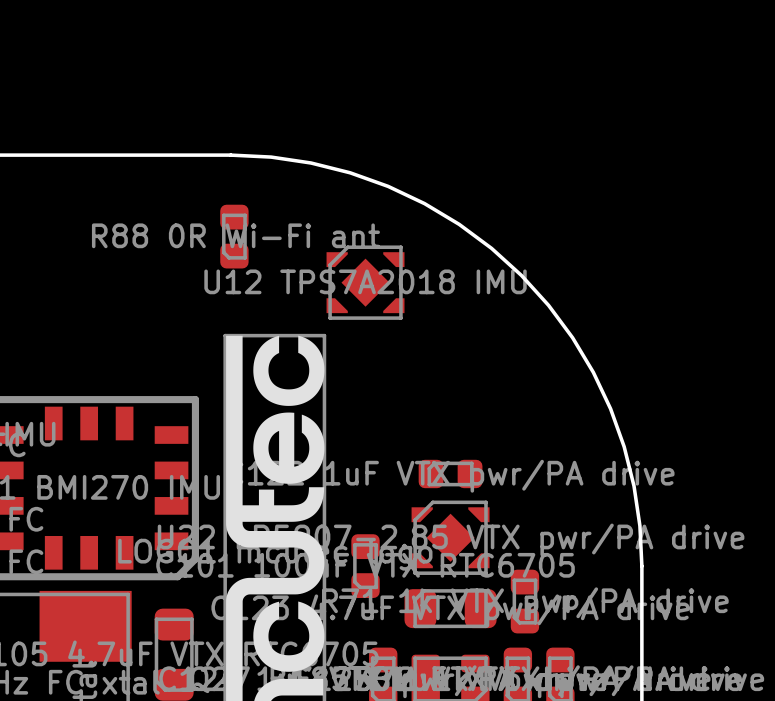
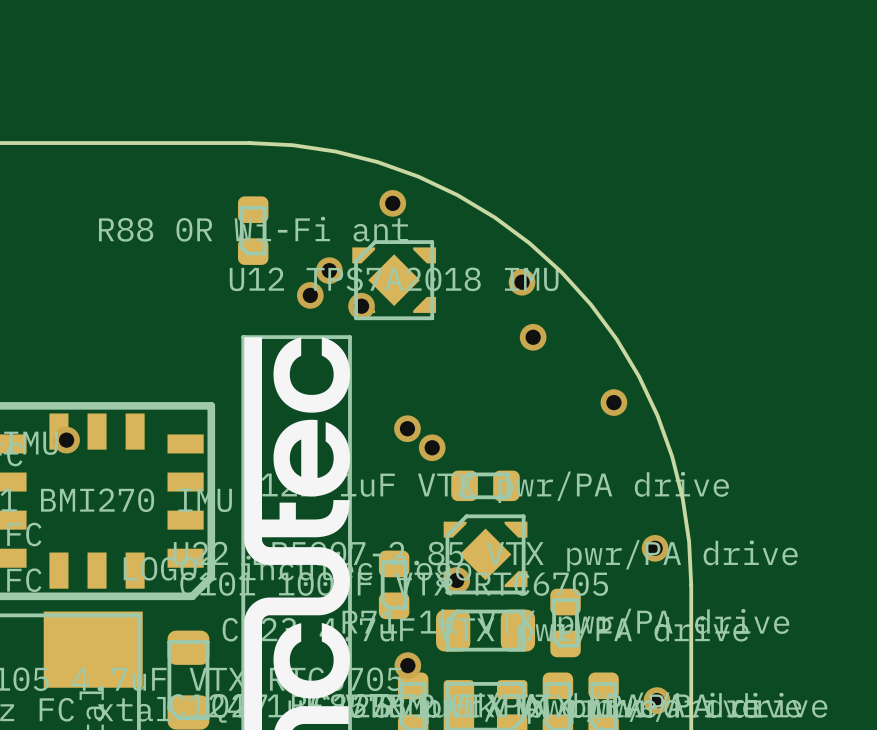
via: none -> (392, 203)
via: none -> (329, 270)
via: none -> (522, 282)
via: none -> (310, 295)
via: none -> (361, 306)
via: none -> (533, 337)
via: none -> (613, 402)
via: none -> (407, 428)
via: none -> (66, 440)
via: none -> (432, 447)
via: none -> (655, 548)
via: none -> (456, 580)
via: none -> (407, 665)
via: none -> (656, 700)

